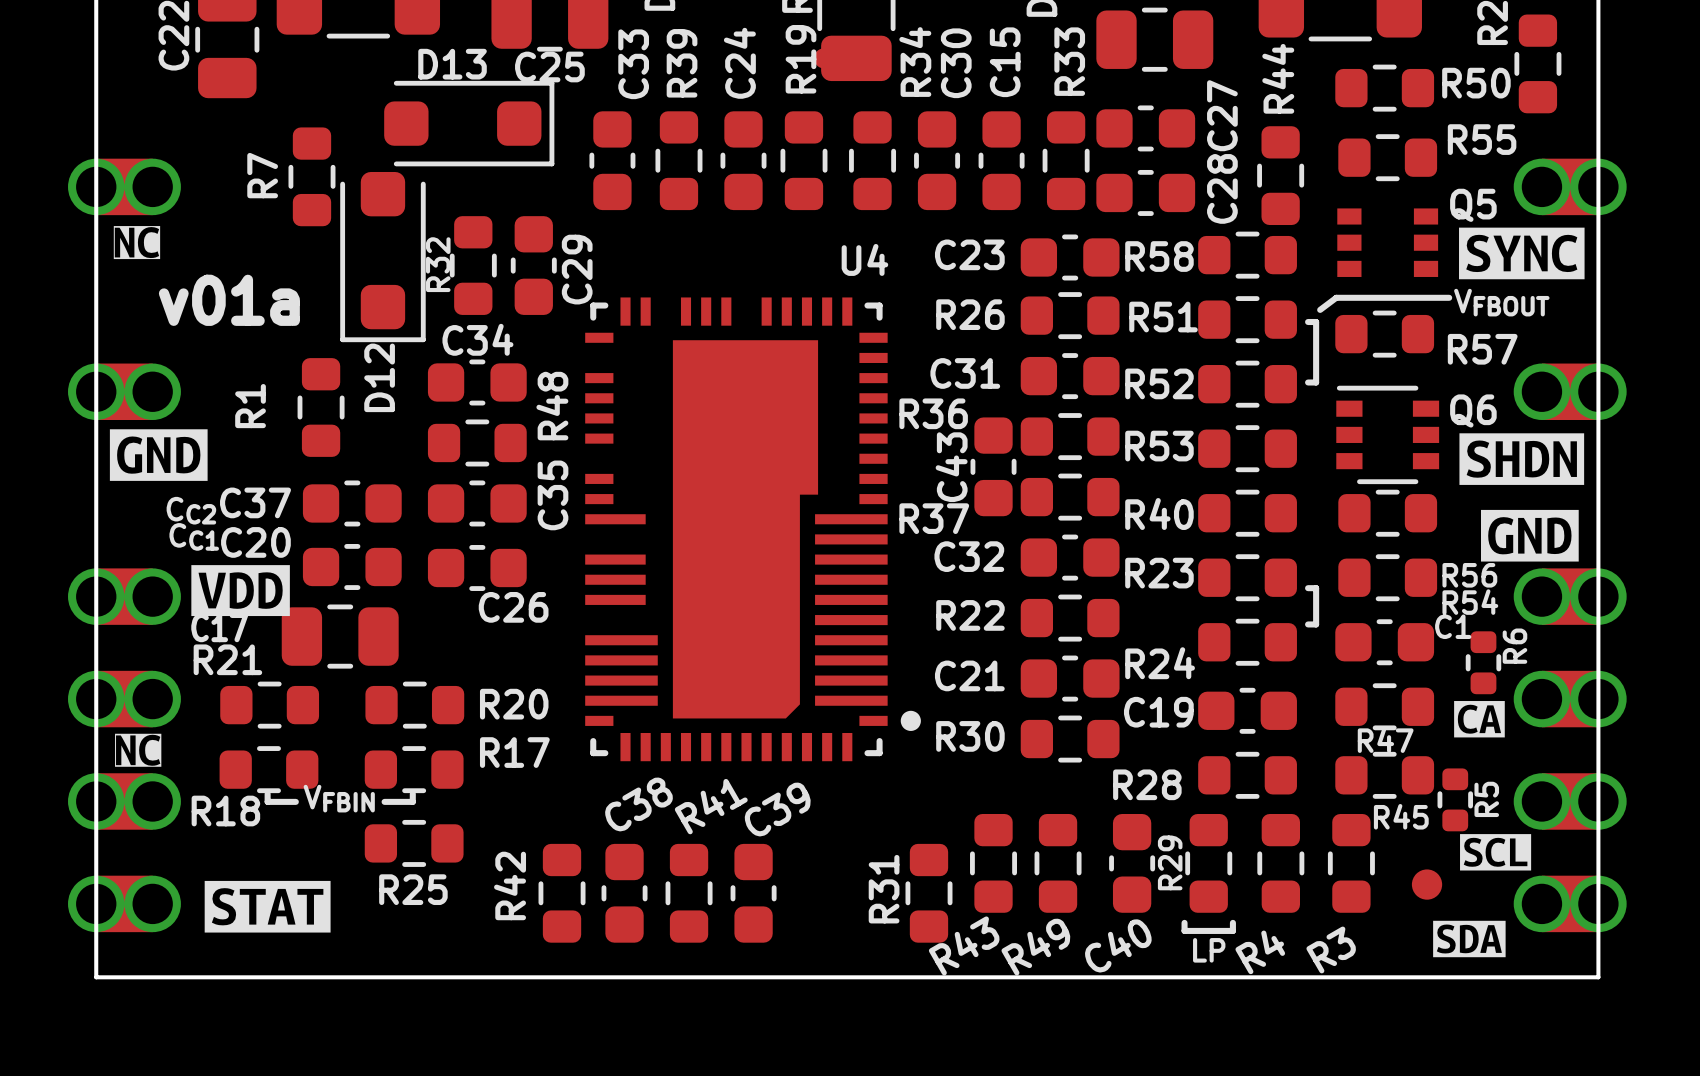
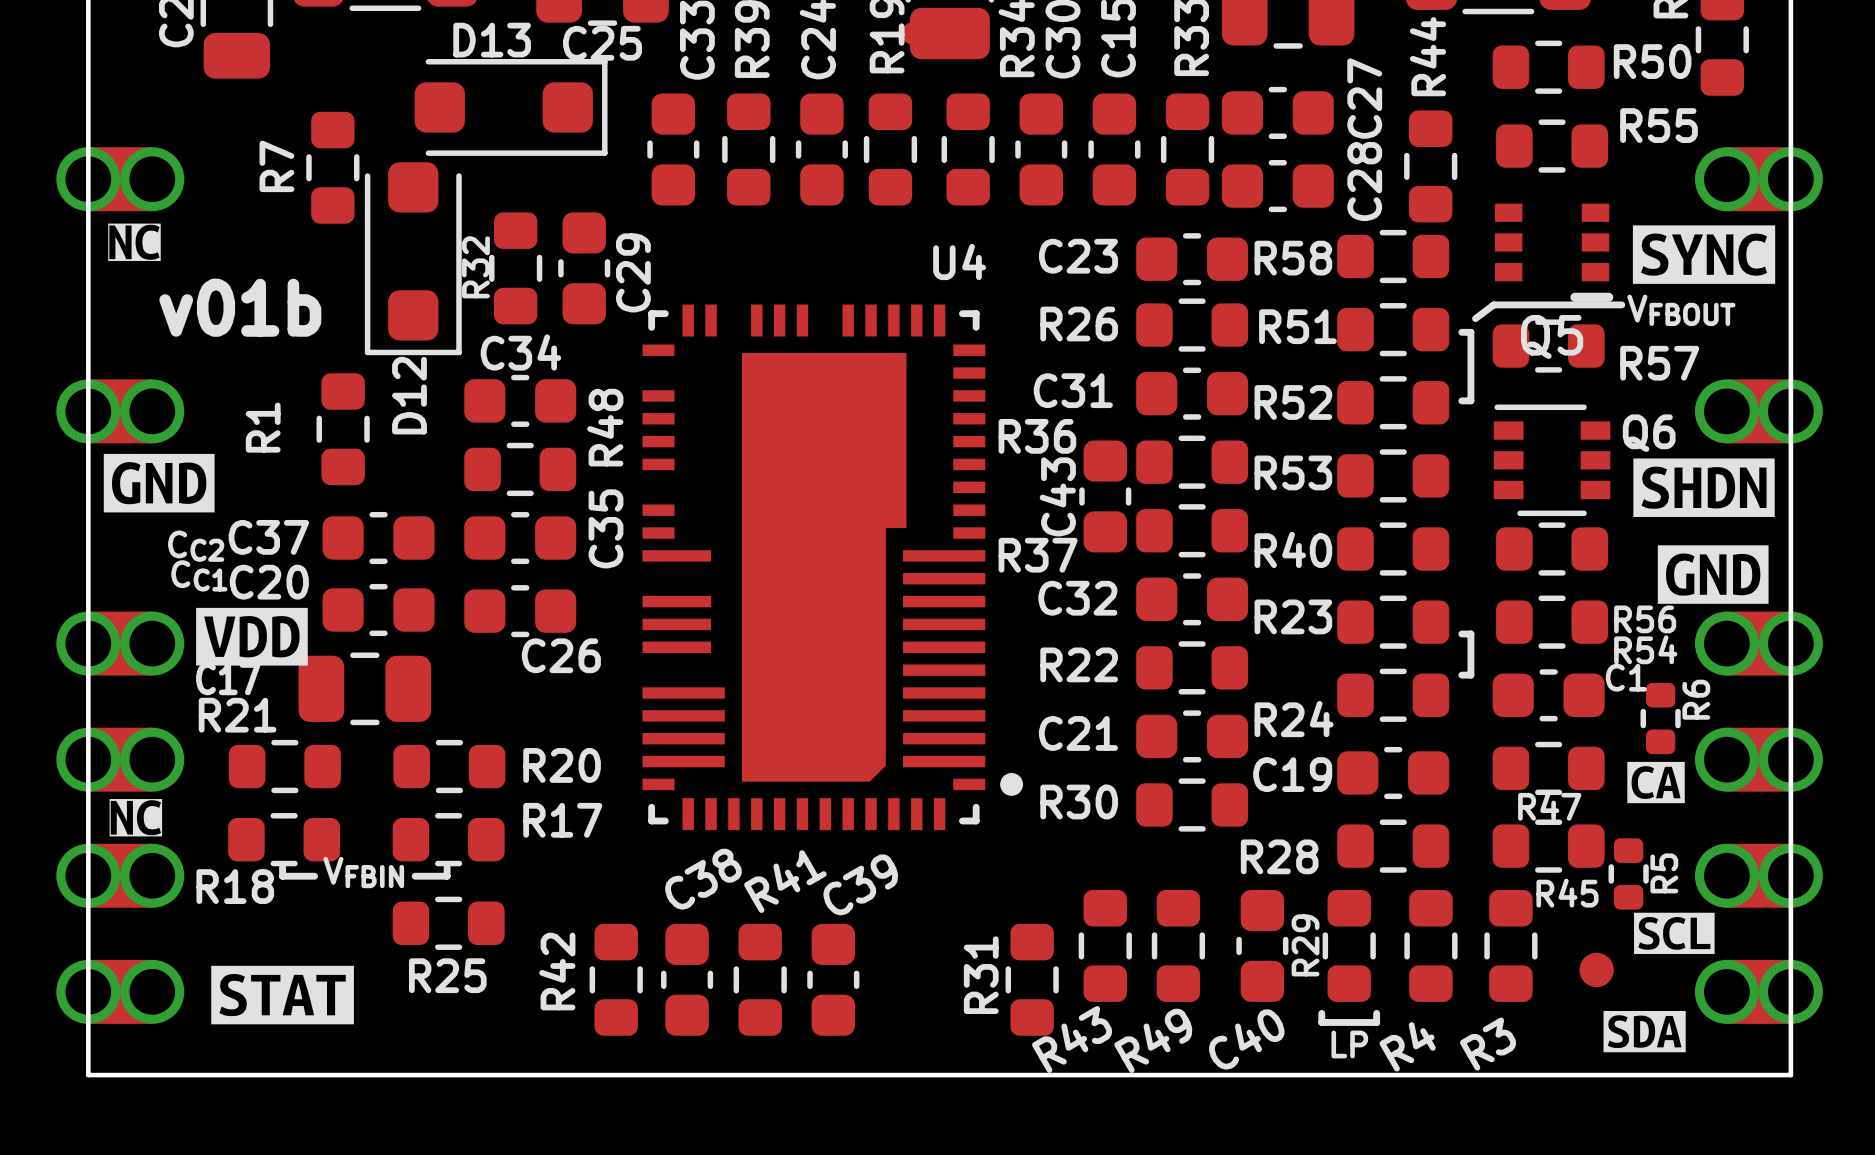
Q5 name position: Q5 (1473, 205) -> Q5 (1552, 336)
Q5 footprint: [1337, 208, 1439, 277] -> [1494, 203, 1614, 302]
text: v01a (229, 300) -> v01b (240, 307)

